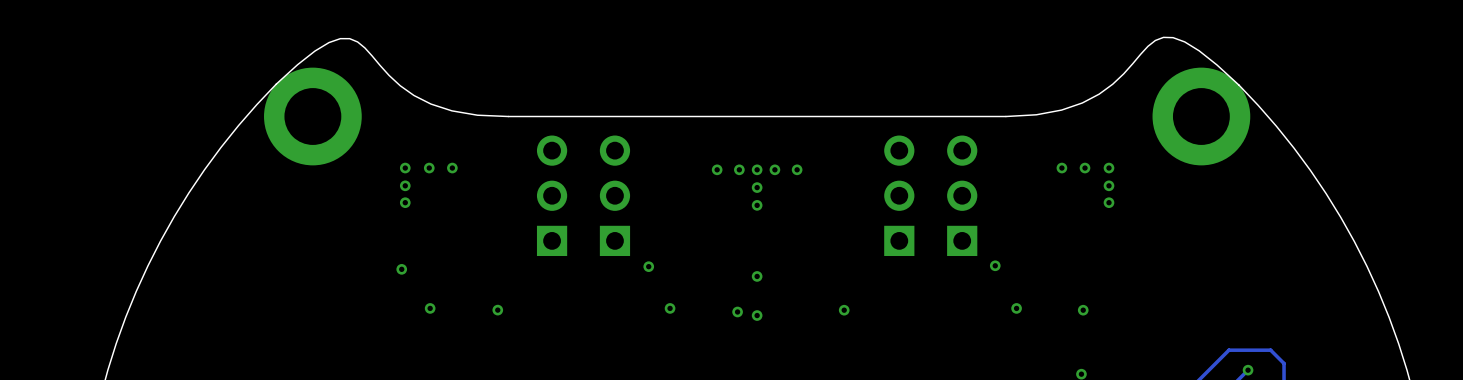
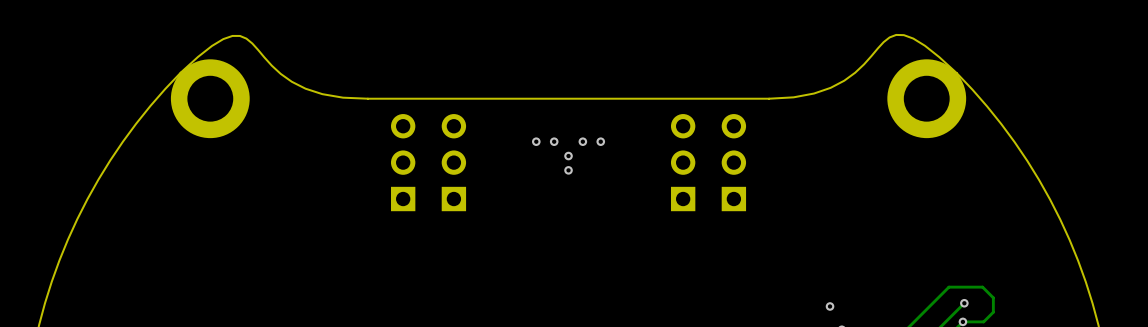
via: (405, 168) -> none
via: (429, 168) -> none
via: (452, 168) -> none
via: (1061, 168) -> none
via: (1085, 168) -> none
via: (1108, 168) -> none
via: (757, 169) -> none
via: (405, 185) -> none
via: (1108, 185) -> none
via: (405, 202) -> none
via: (1108, 202) -> none
via: (995, 265) -> none
via: (648, 266) -> none
via: (401, 269) -> none
via: (757, 276) -> none
via: (430, 308) -> none
via: (670, 308) -> none
via: (1016, 308) -> none
via: (497, 310) -> none
via: (844, 310) -> none
via: (1083, 310) -> none
via: (737, 311) -> none
via: (757, 315) -> none

